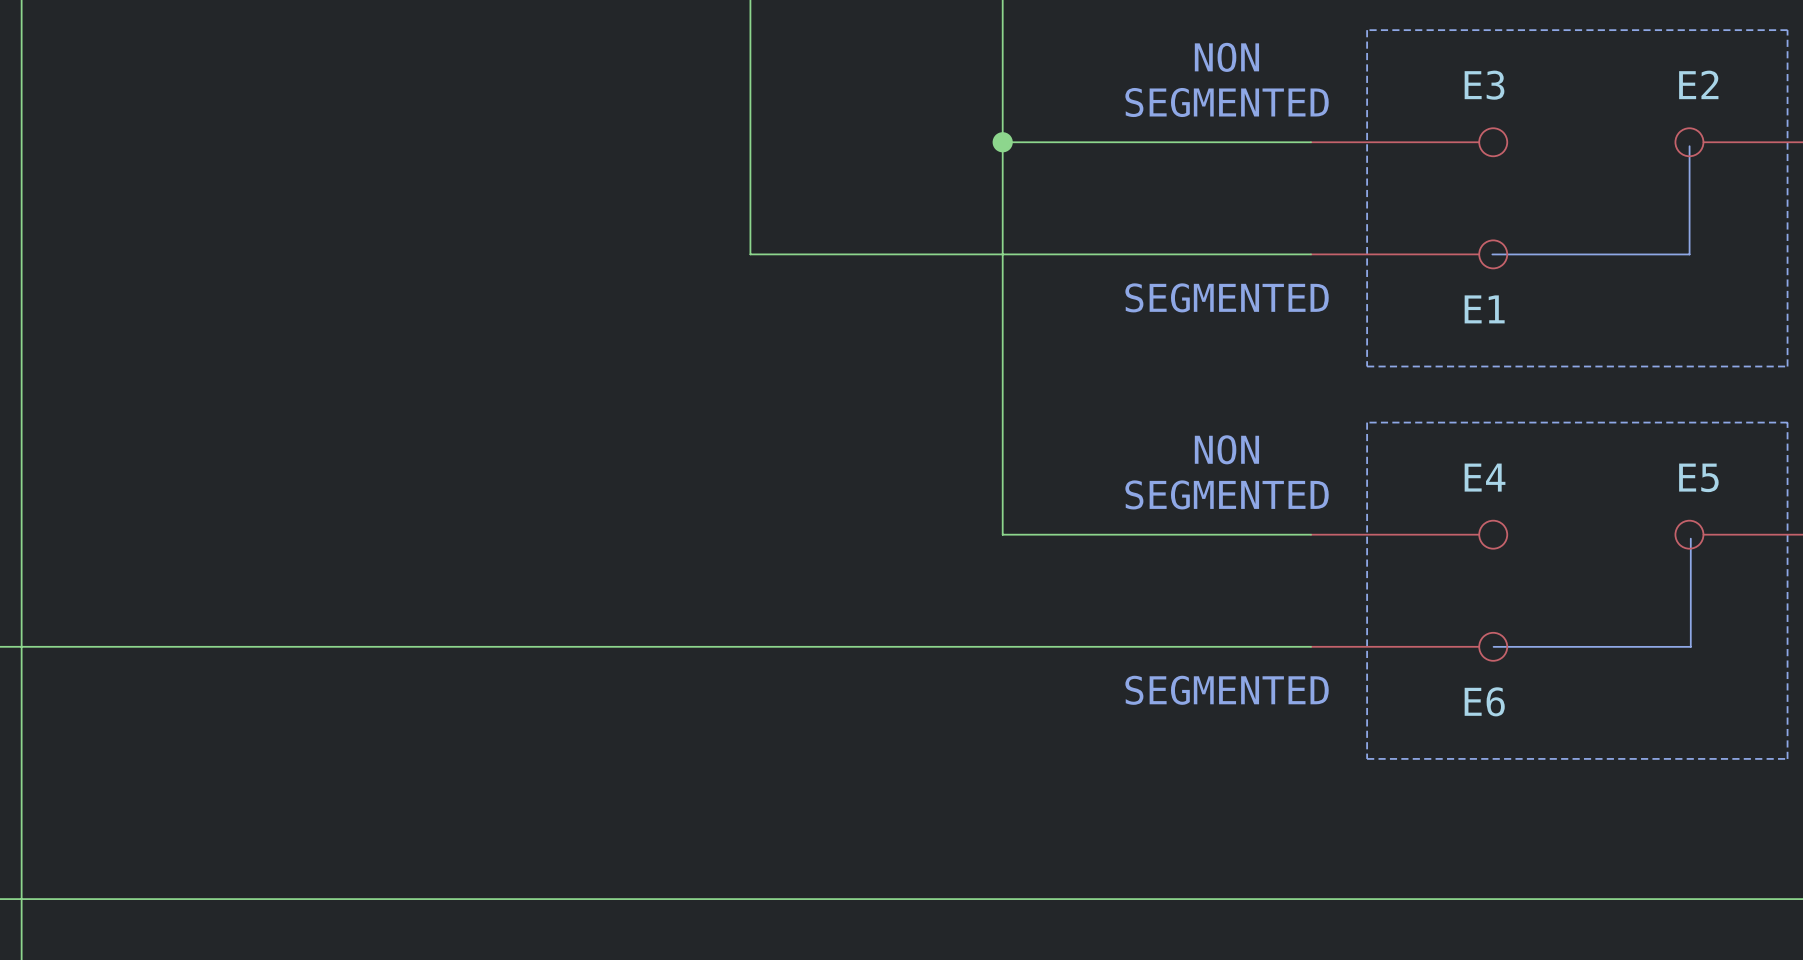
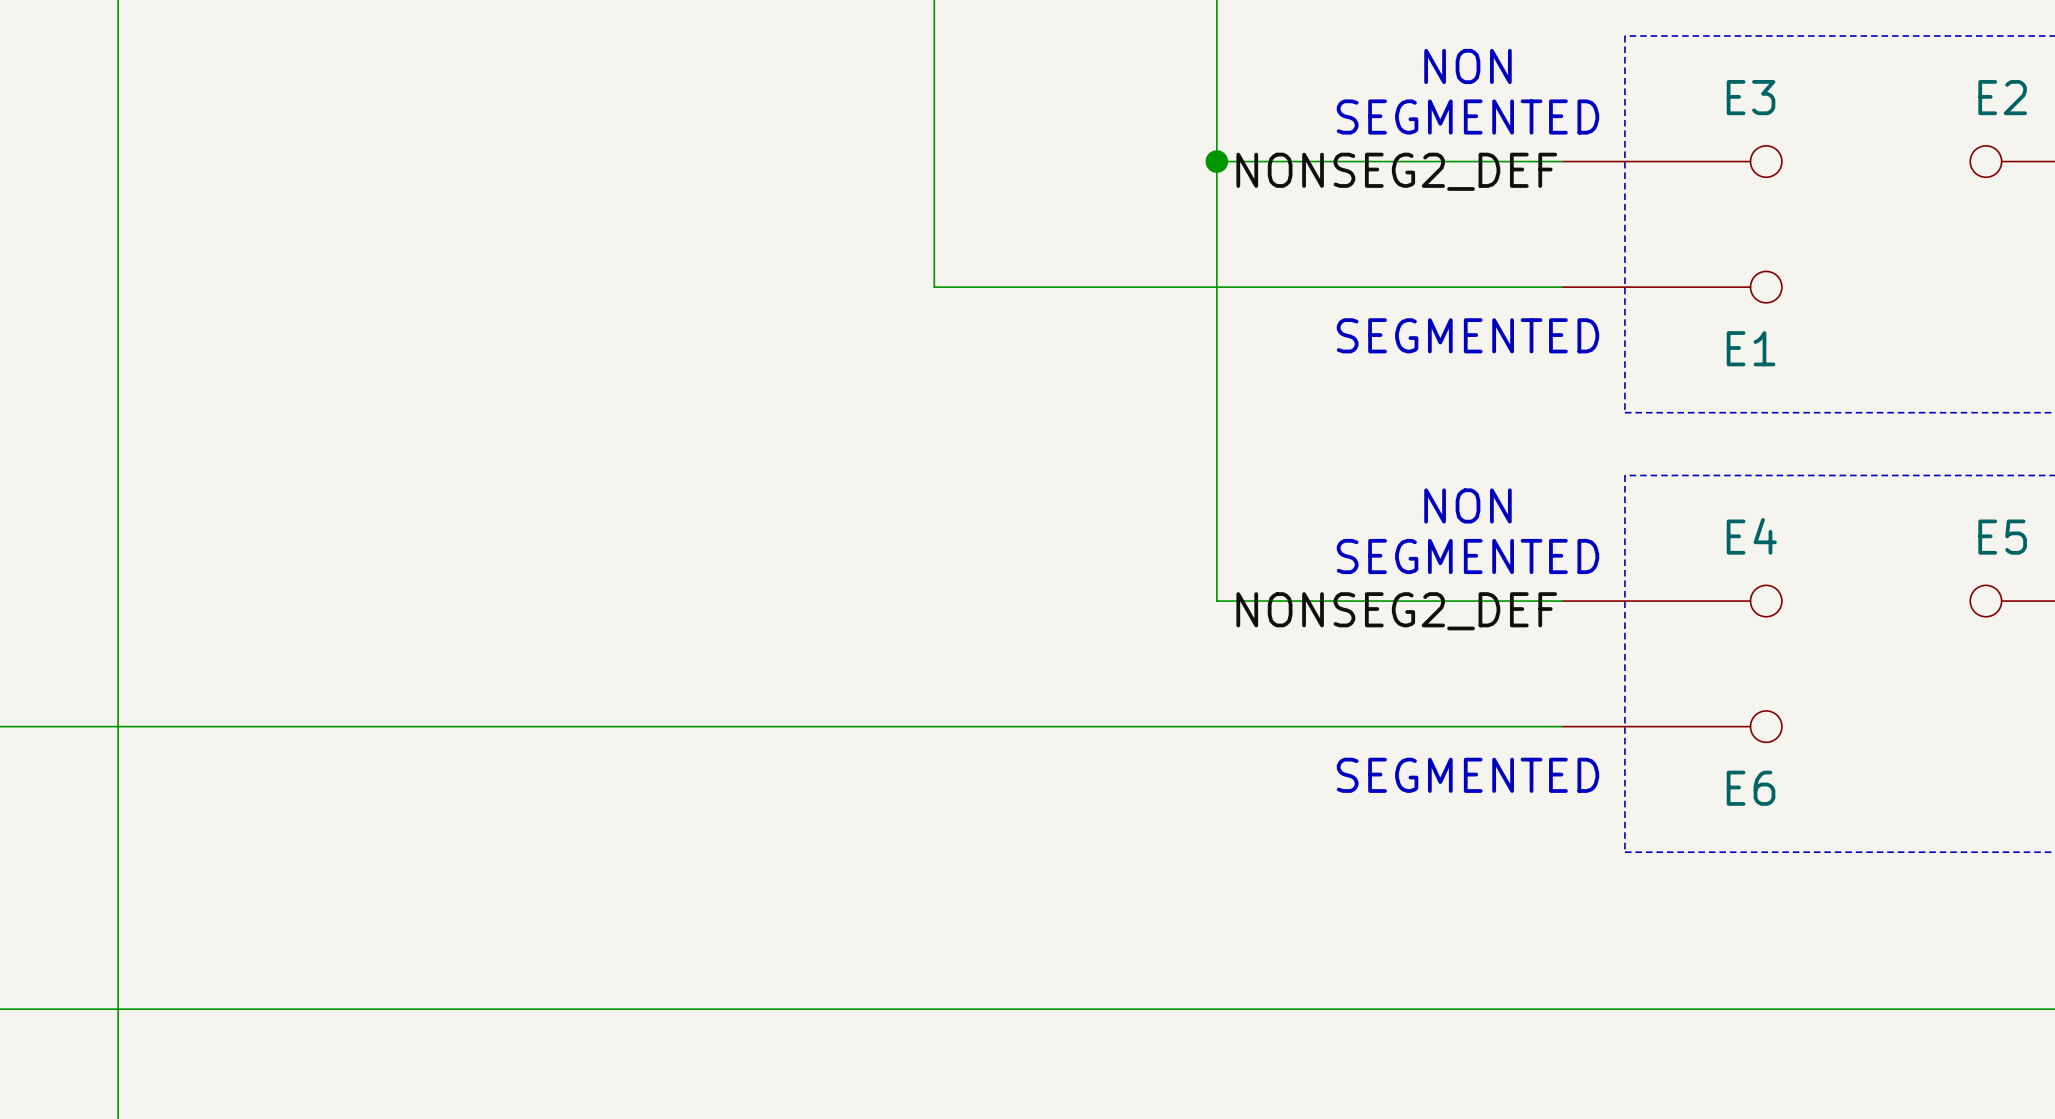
line: (1689, 146) (1689, 254) (1492, 254) -> none
label: none -> NONSEG2_DEF (1396, 171)
line: (1690, 538) (1690, 646) (1493, 646) -> none
label: none -> NONSEG2_DEF (1396, 611)

